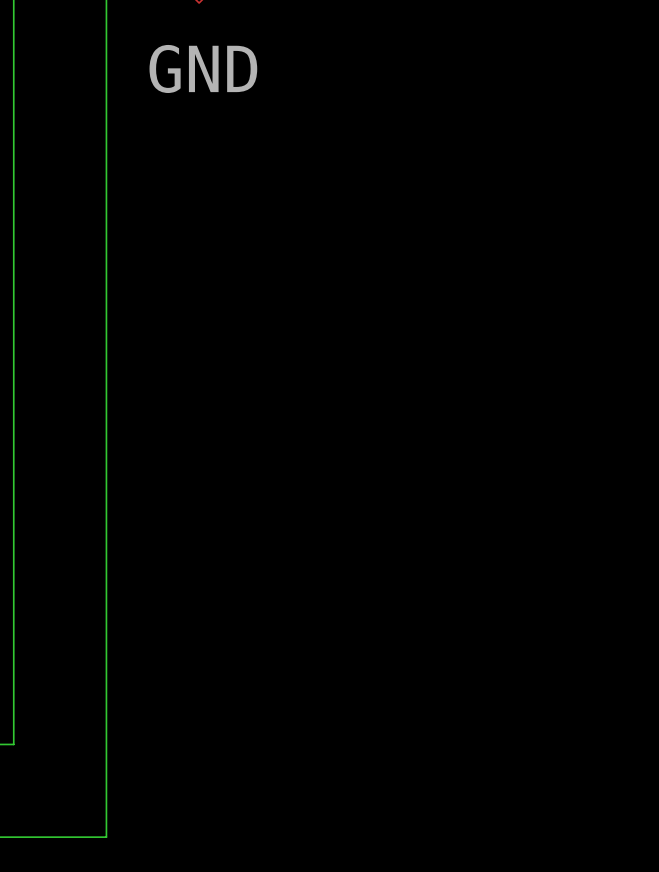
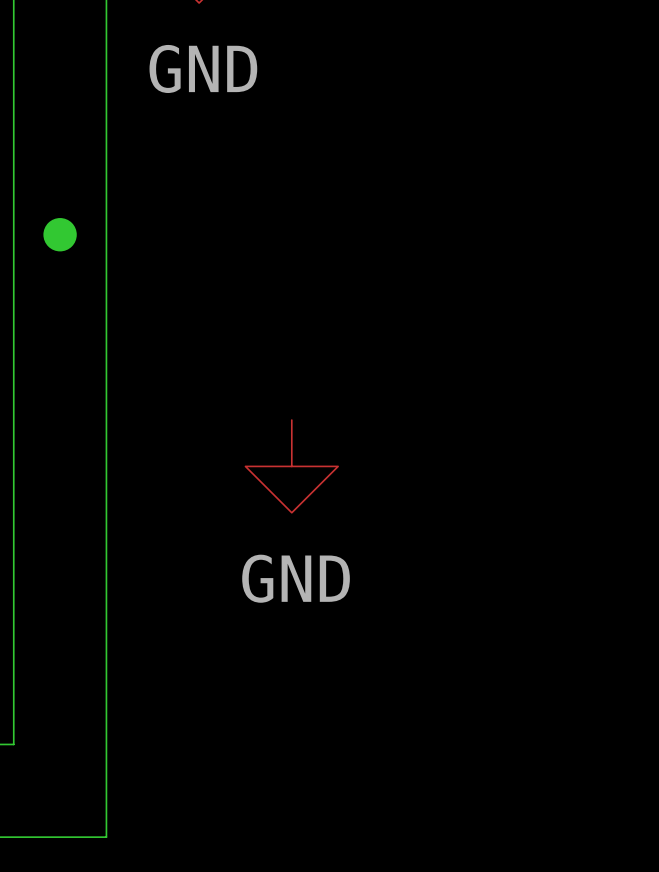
junction: none -> (60, 234)
power symbol: none -> GND (291, 466)

